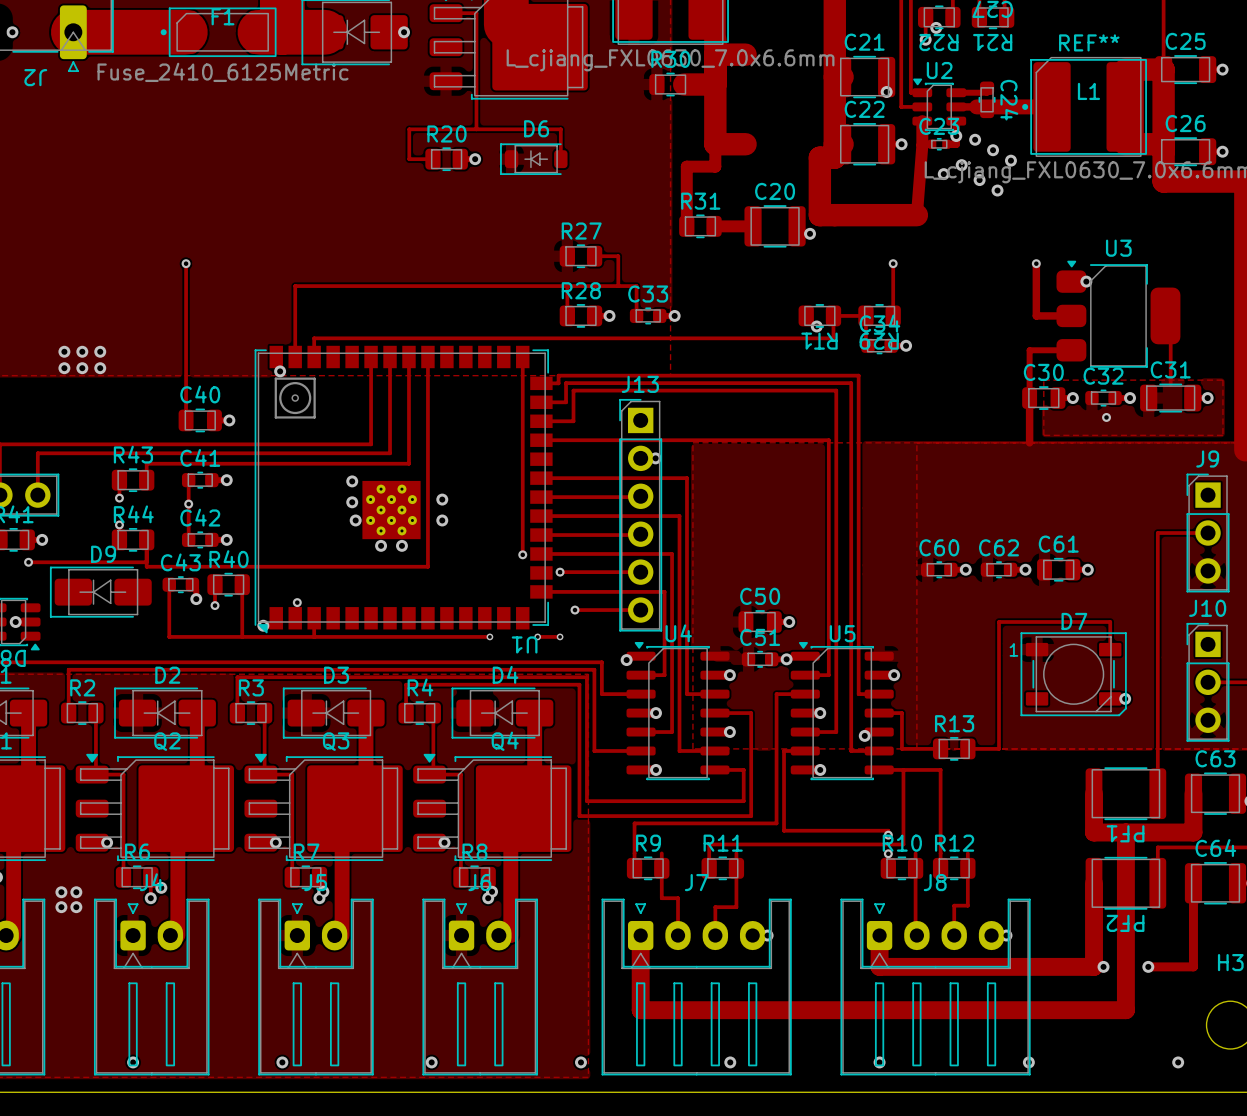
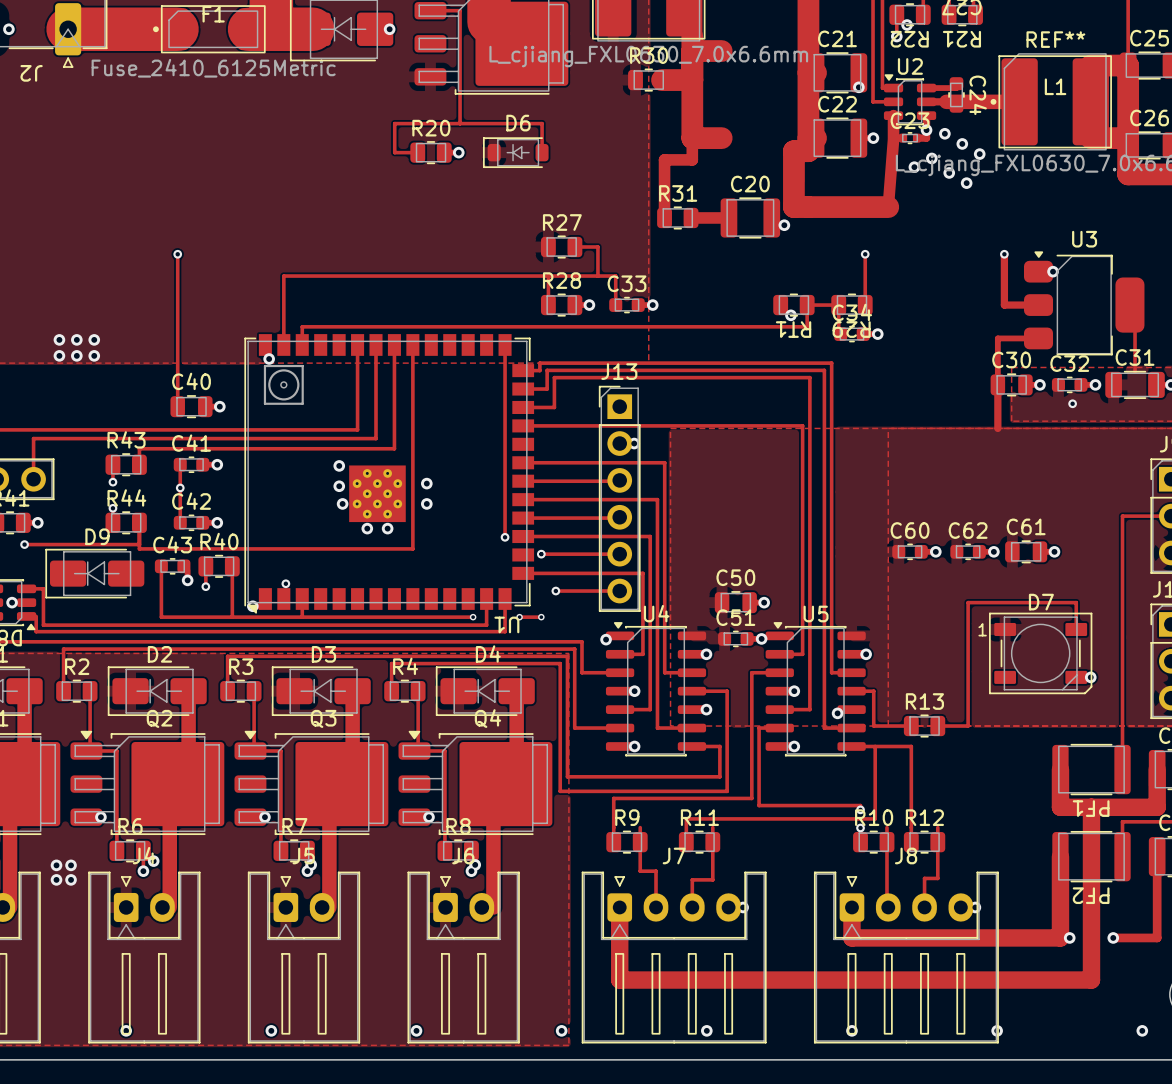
track: none -> (36, 588) (43, 588) (43, 625) (486, 625) (486, 609)
track: none -> (505, 609) (505, 631) (36, 631) (36, 616)

